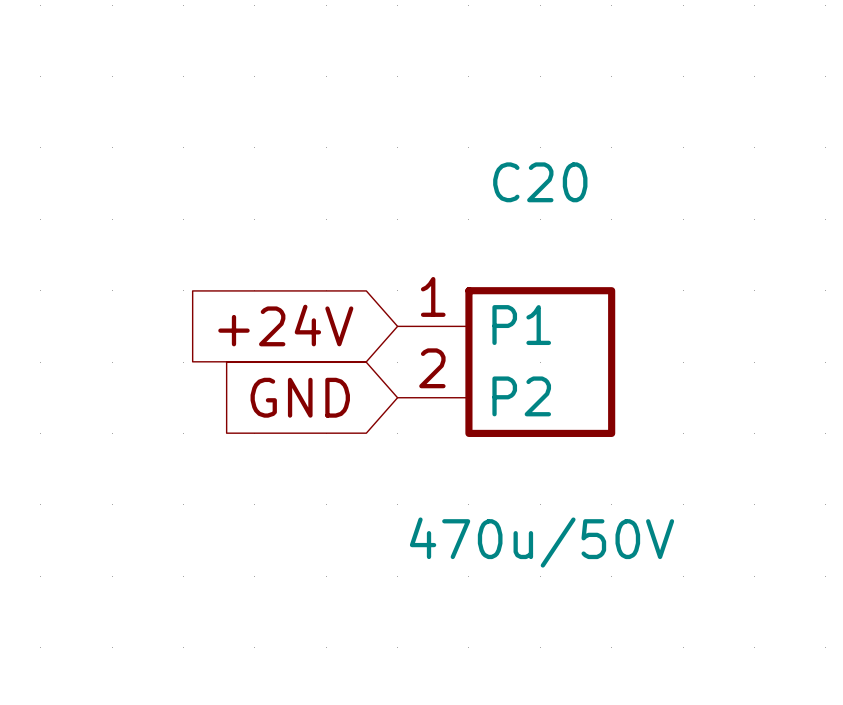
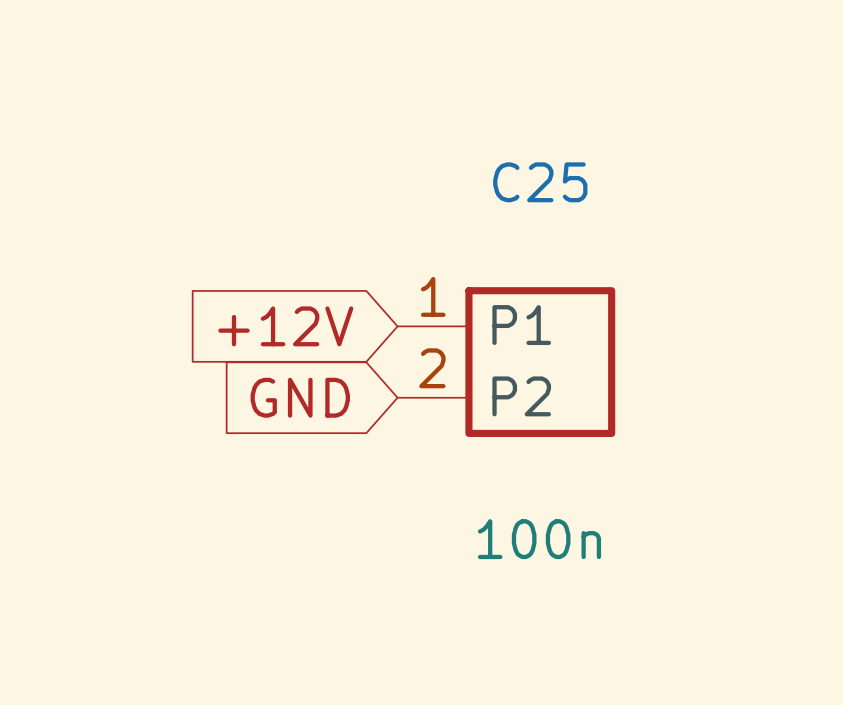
C20 name: C20 (540, 182) -> C25 (540, 182)
global label: +24V (285, 325) -> +12V (285, 326)
C20 value: 470u/50V (541, 542) -> 100n (539, 539)

